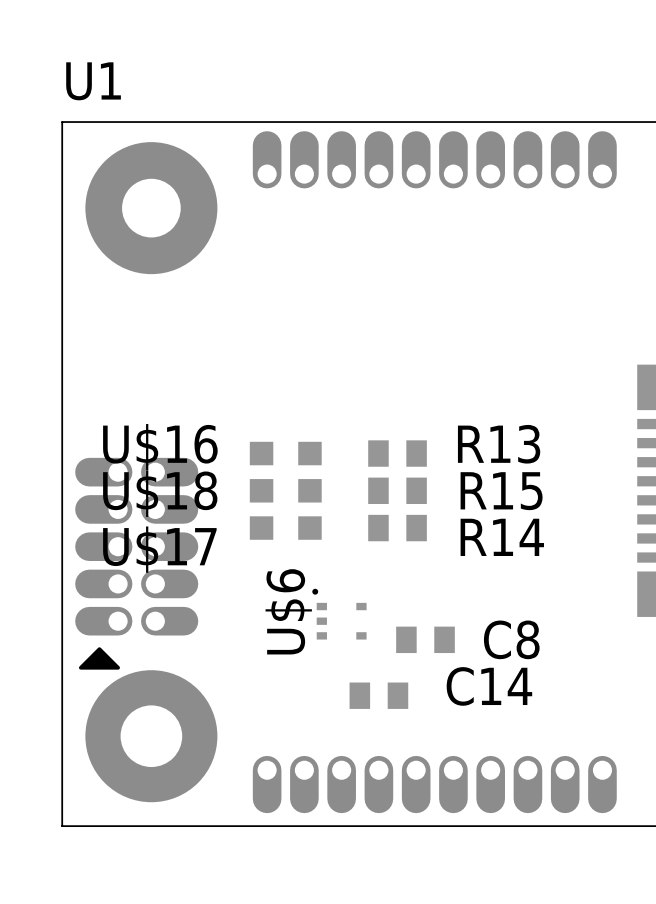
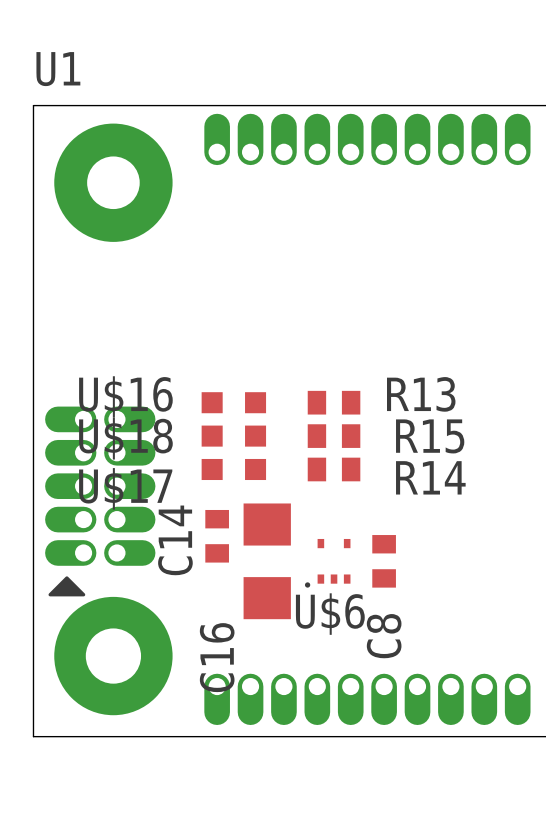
U$6 rotation: 0° (339, 614) -> 90° counterclockwise (327, 563)
U$6 position: (339, 614) -> (327, 563)
C16: none -> (267, 561)
C8 rotation: 0° (425, 639) -> 90° clockwise (384, 561)
C14 name position: C14 (489, 686) -> C14 (175, 540)
C14 rotation: 0° (378, 695) -> 90° clockwise (217, 536)
C14 position: (378, 695) -> (217, 536)

